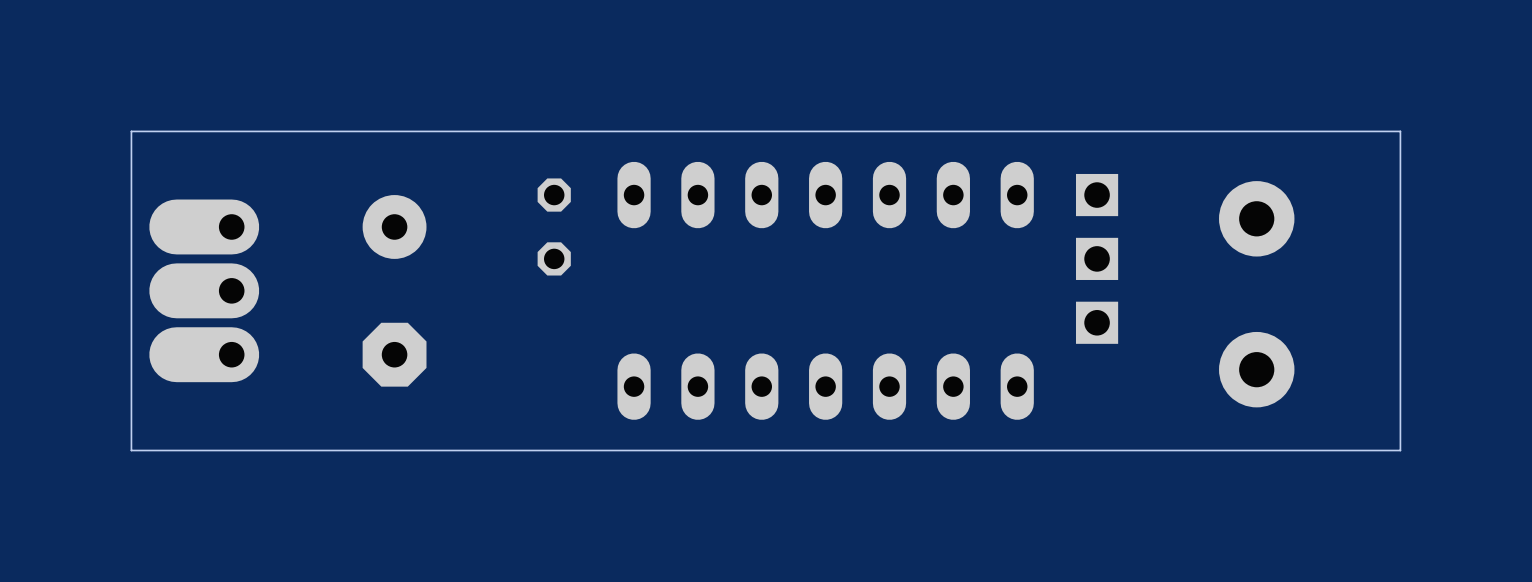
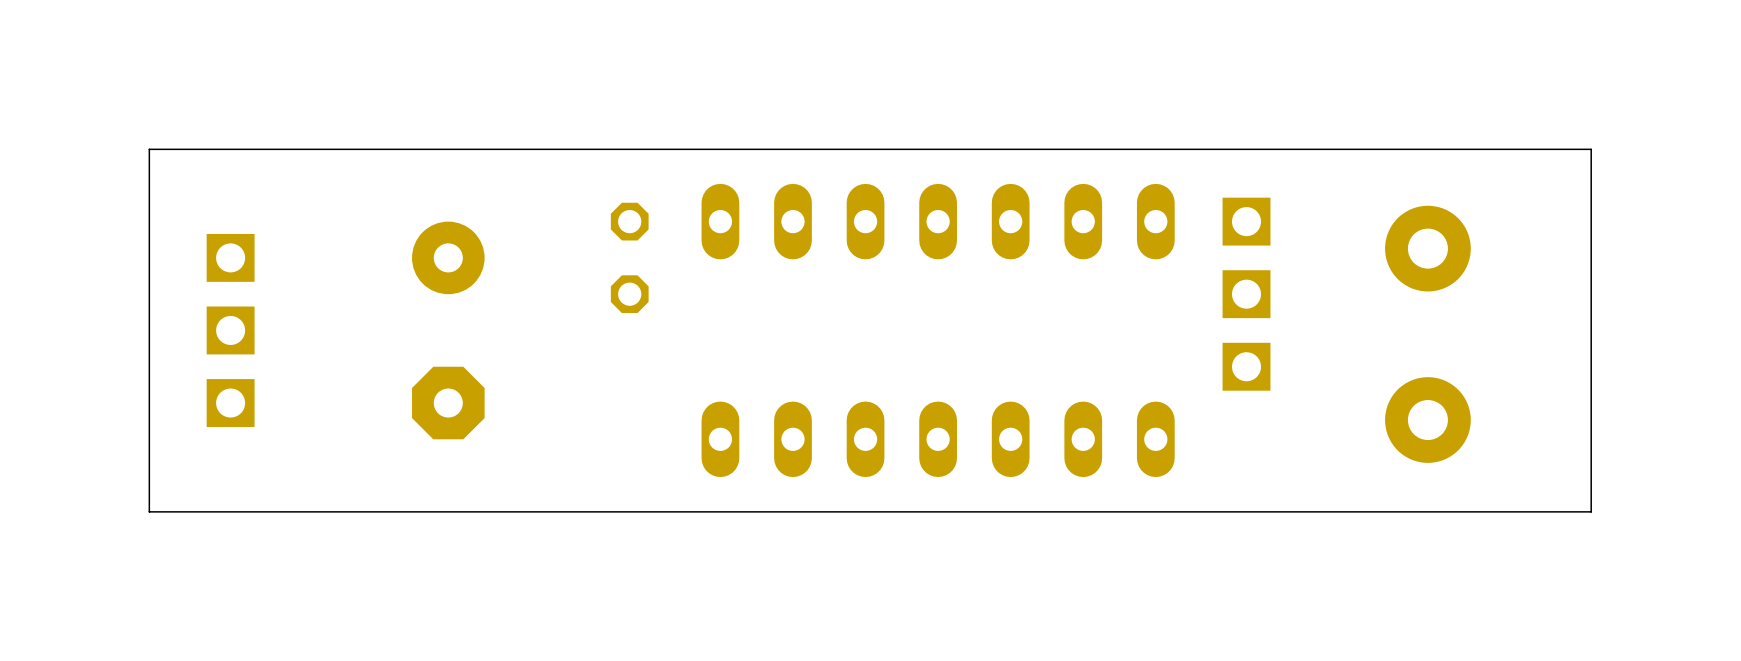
part footprint: [149, 199, 260, 383] -> [206, 233, 255, 427]

